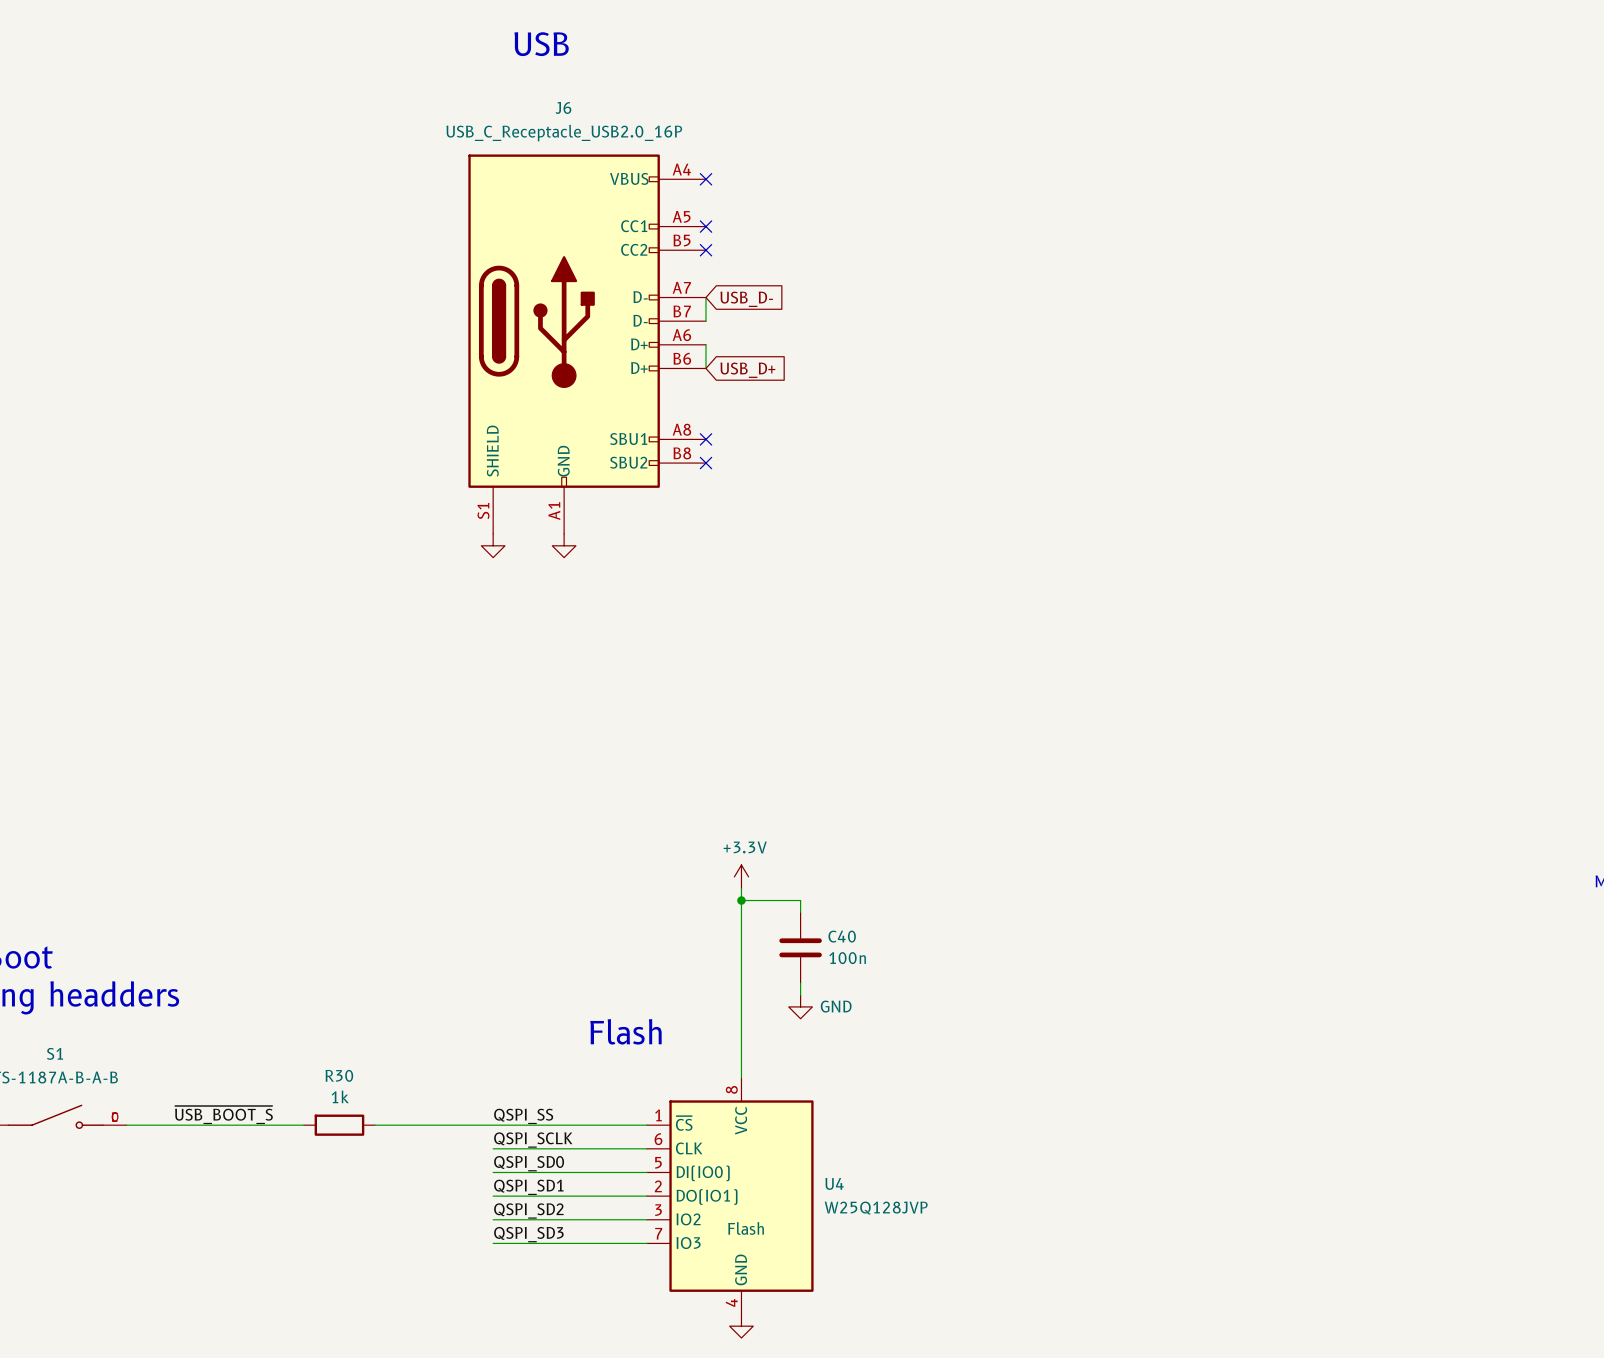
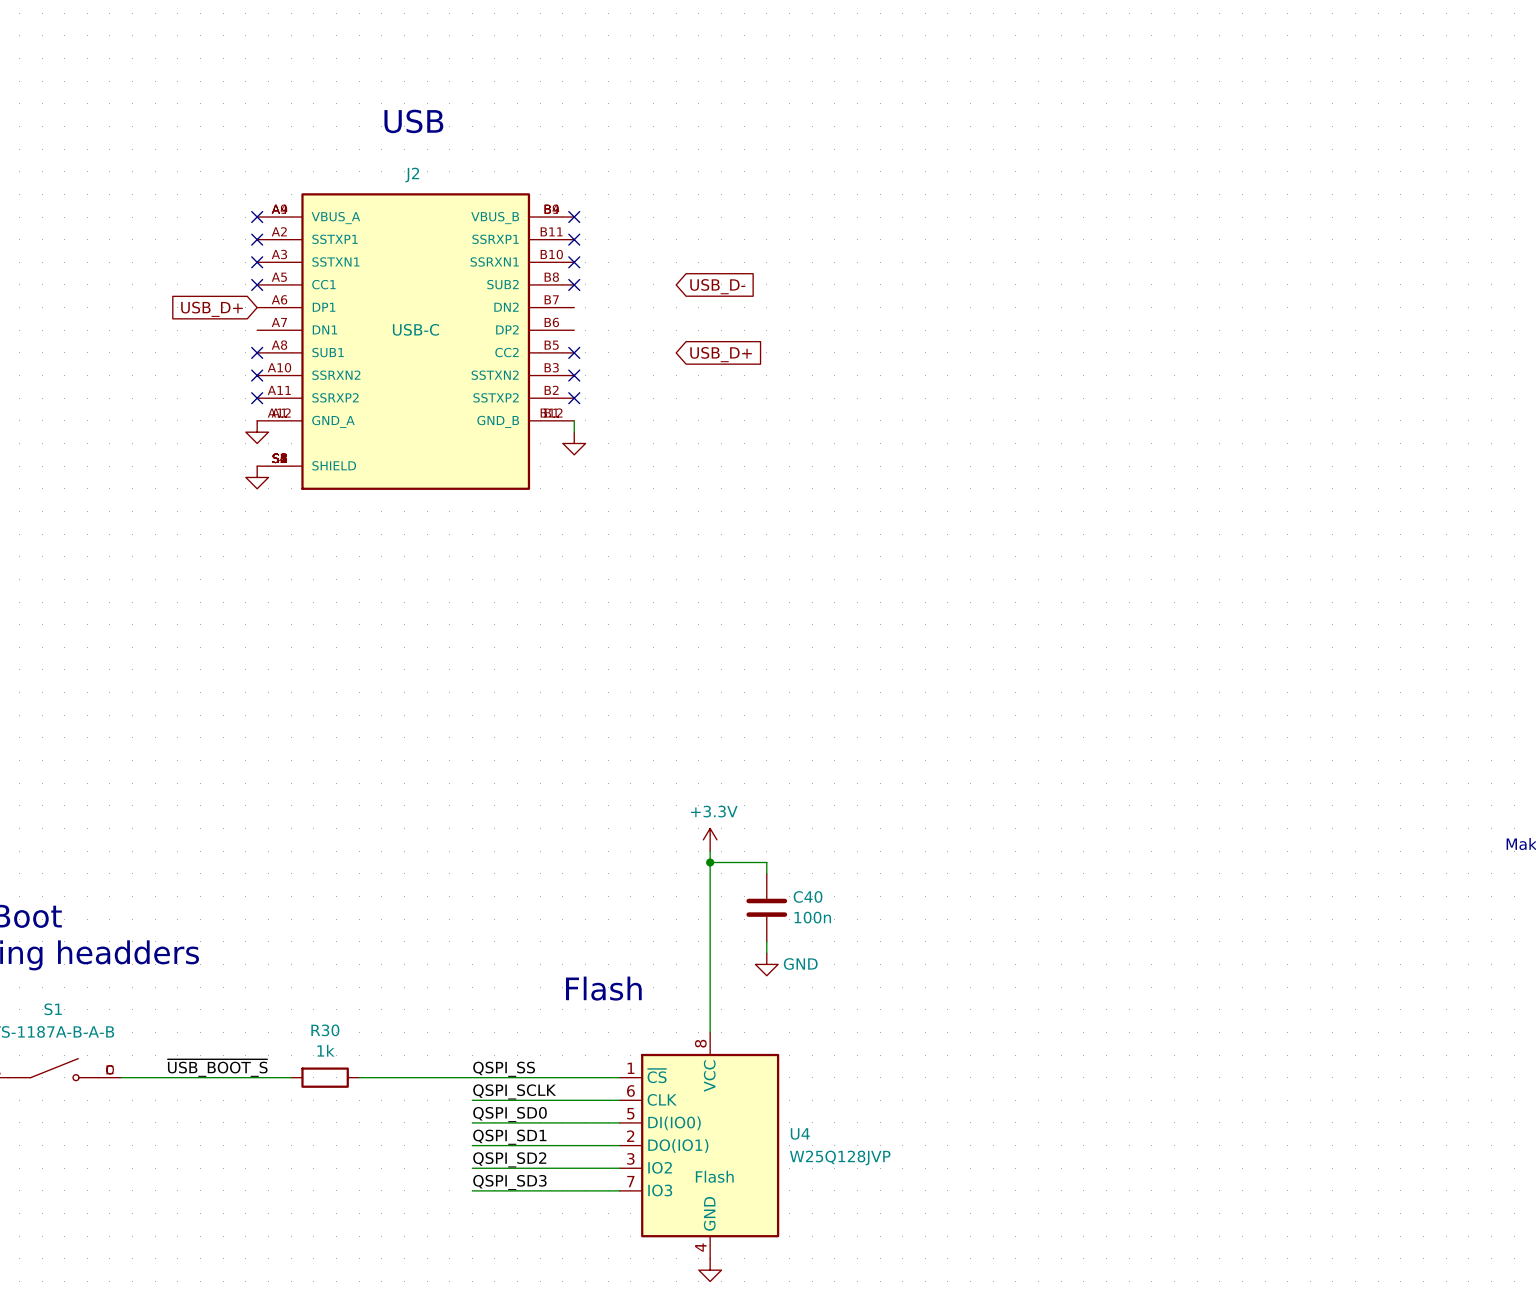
text position: USB (541, 44) -> USB (413, 121)
no-connect mark: (705, 179) -> none
no-connect mark: none -> (257, 217)
no-connect mark: none -> (574, 217)
no-connect mark: (705, 226) -> none
no-connect mark: none -> (257, 239)
no-connect mark: none -> (574, 239)
no-connect mark: (705, 250) -> none
no-connect mark: none -> (257, 262)
no-connect mark: none -> (574, 262)
no-connect mark: none -> (257, 284)
no-connect mark: none -> (574, 284)
wire: (705, 297) (705, 321) -> none
global label: none -> USB_D+ (211, 309)
J6: USB_C_Receptacle_USB2.0_16P (587, 344) -> none
wire: (705, 344) (705, 368) -> none
J2: none -> (415, 341)
no-connect mark: none -> (257, 352)
no-connect mark: none -> (574, 352)
no-connect mark: none -> (257, 375)
no-connect mark: none -> (574, 375)
no-connect mark: none -> (257, 398)
no-connect mark: none -> (574, 398)
no-connect mark: (705, 439) -> none
power symbol: none -> (257, 432)
power symbol: none -> (574, 443)
no-connect mark: (705, 463) -> none
power symbol: none -> (257, 477)
power symbol: (493, 545) -> none
power symbol: (564, 545) -> none

